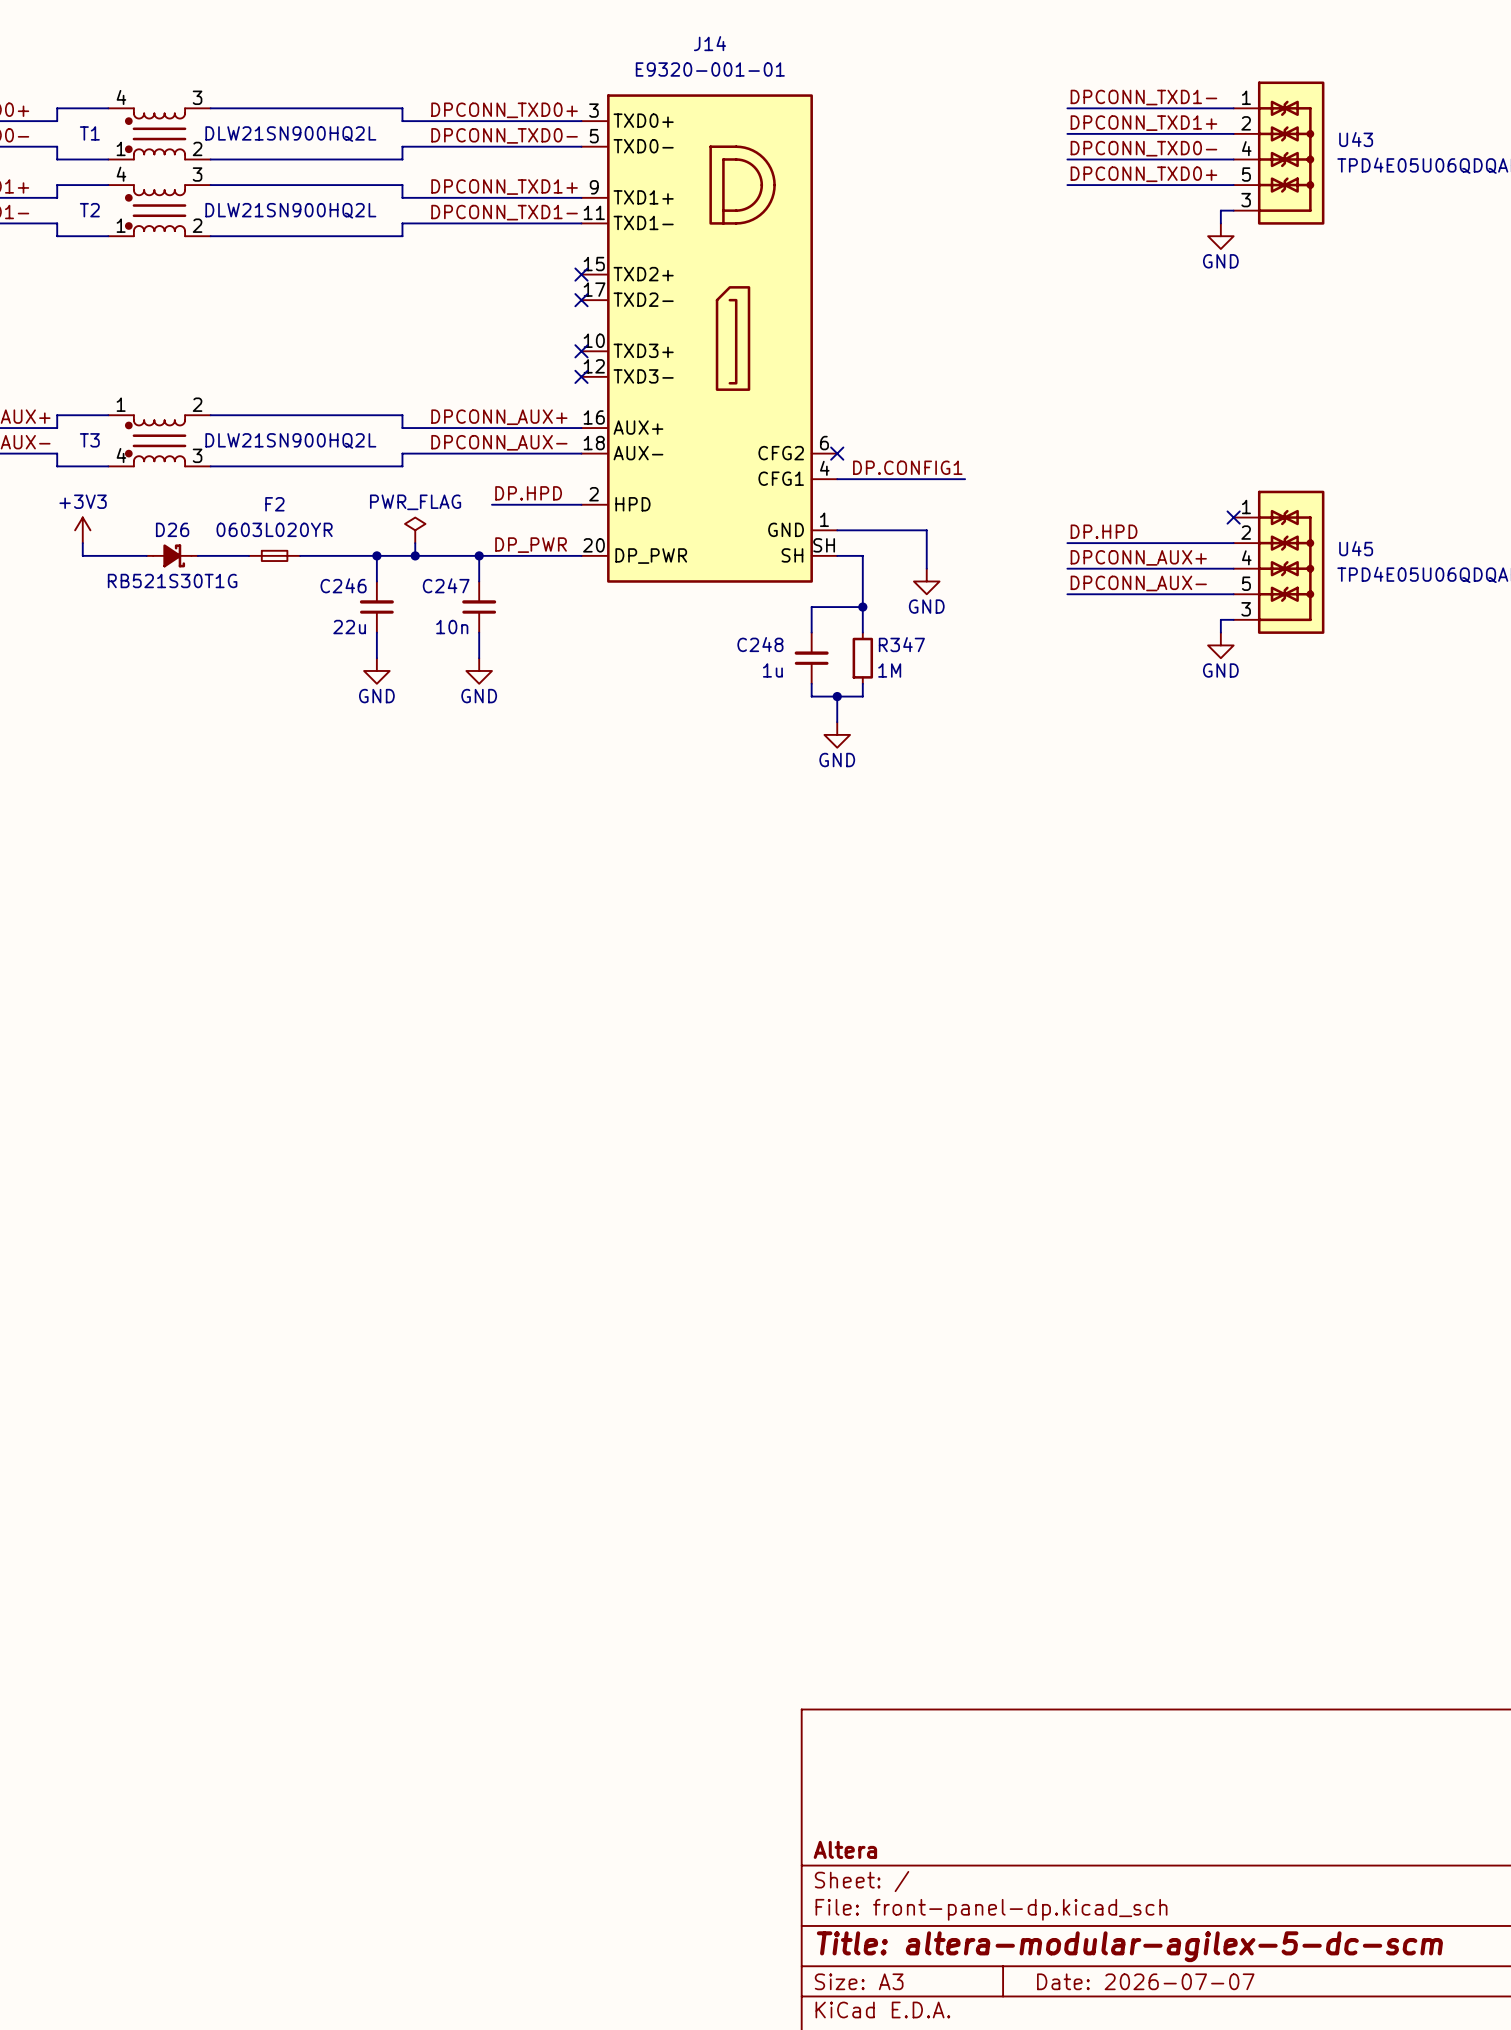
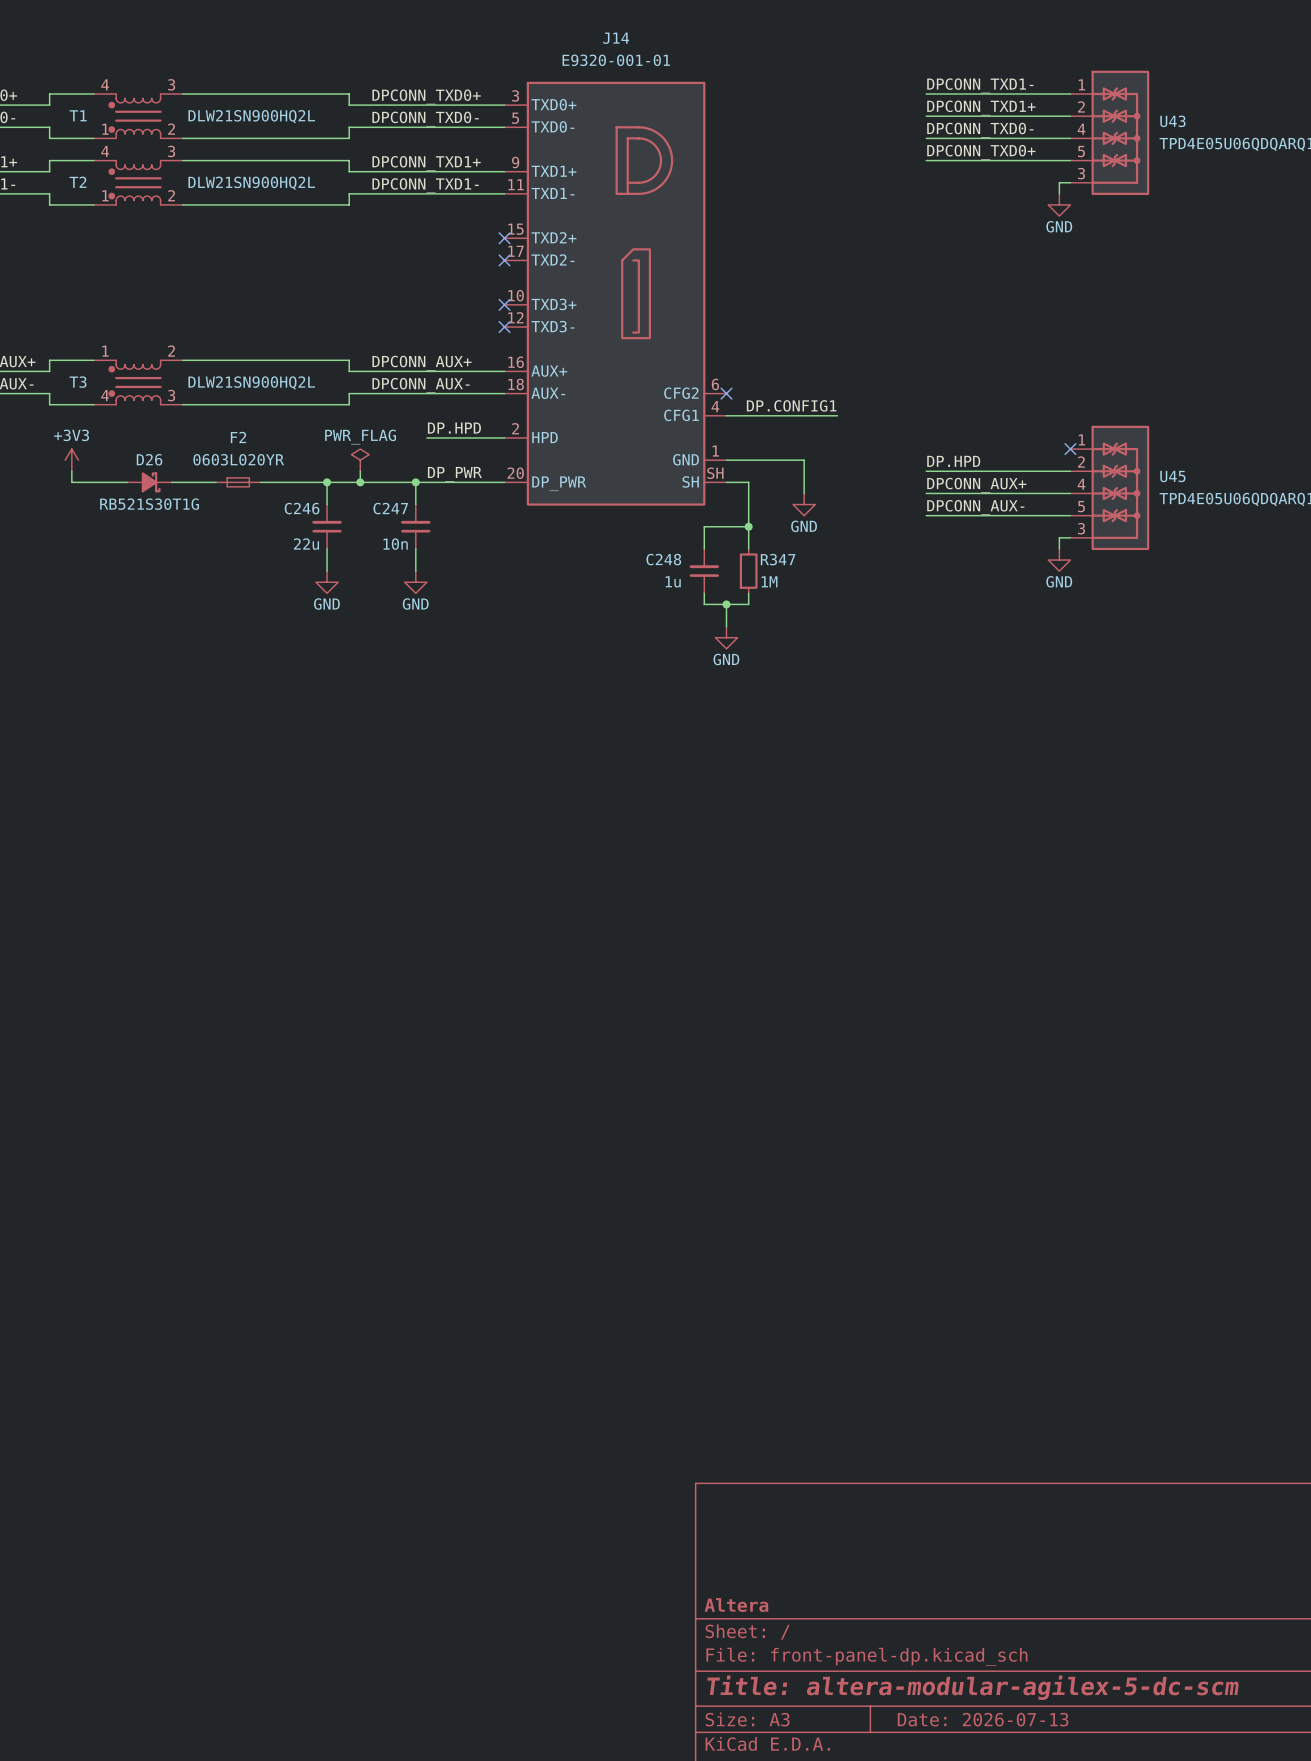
title block: Date: 2026-07-07 (1145, 1981) -> Date: 2026-07-13 (983, 1719)

